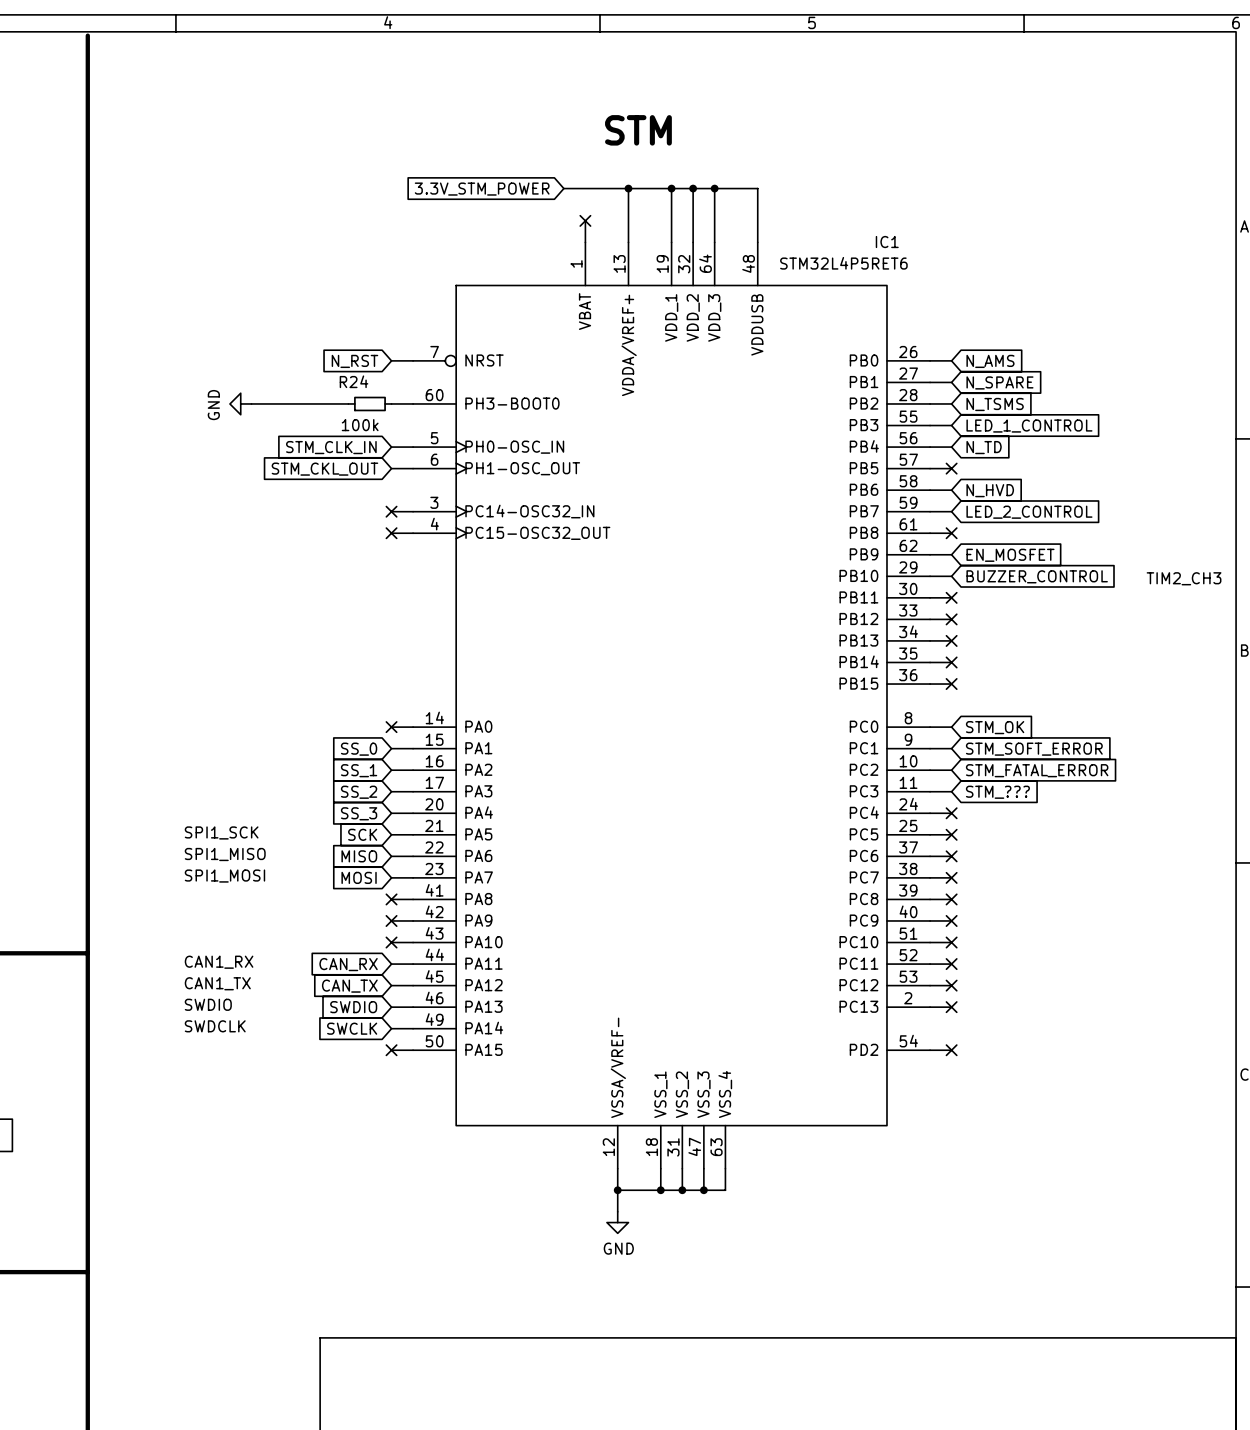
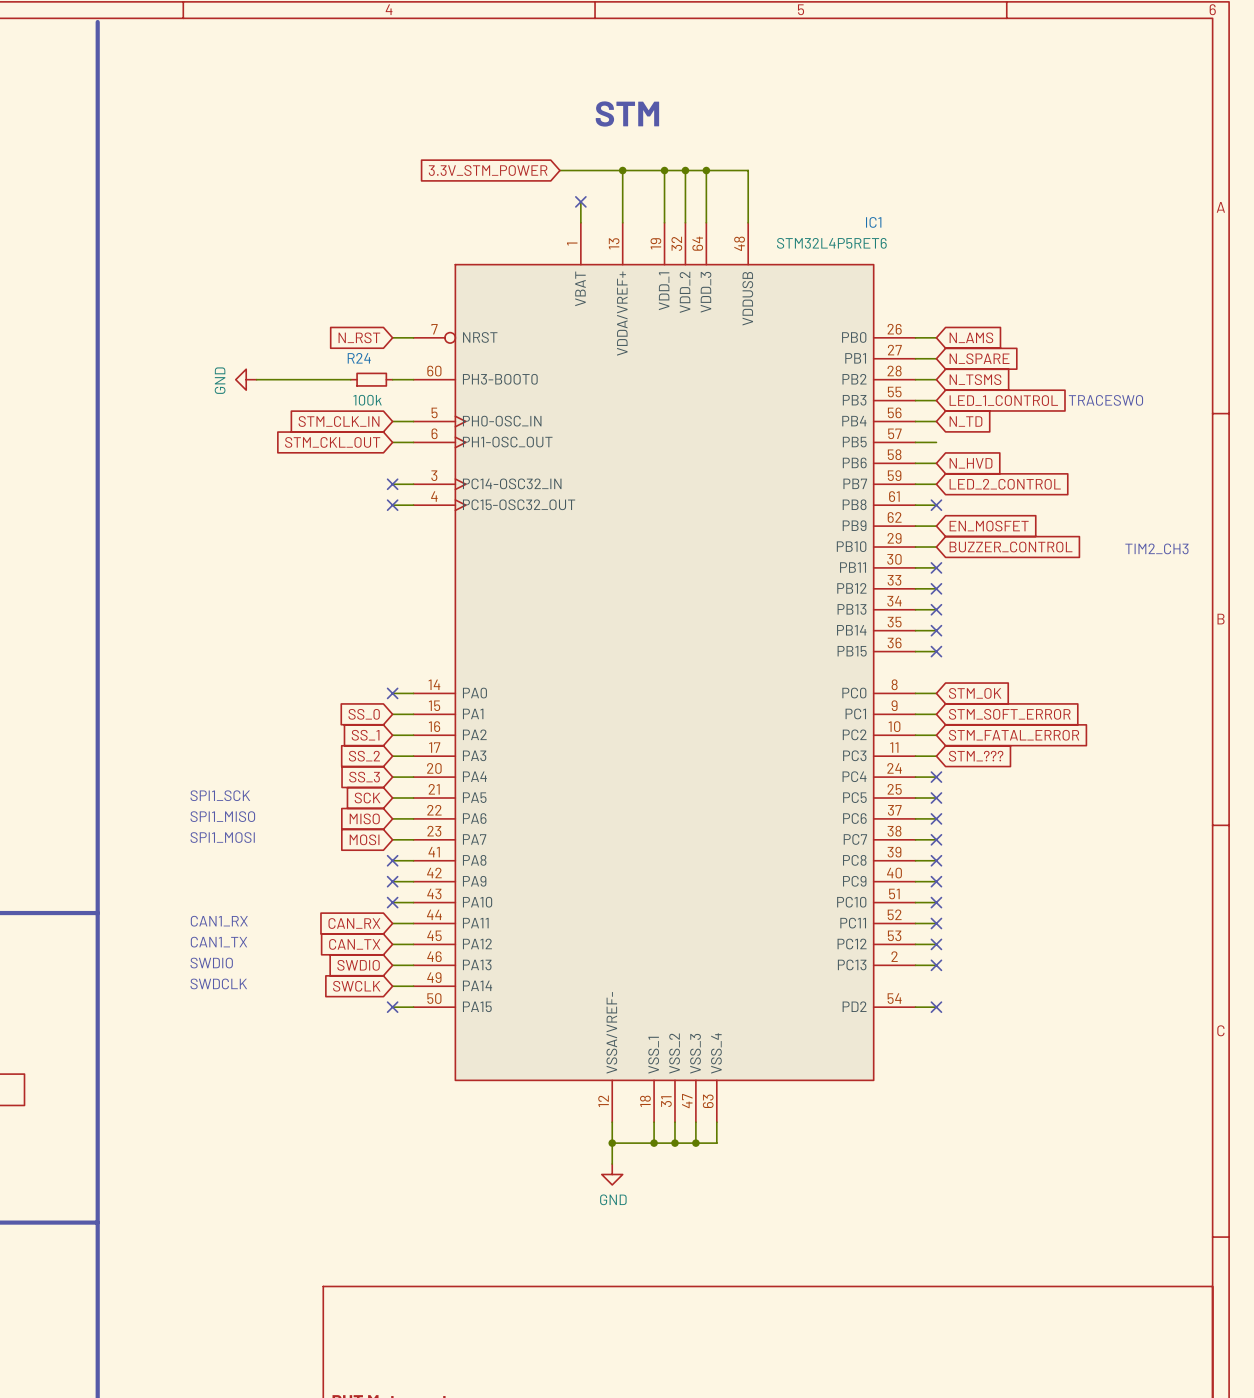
text: none -> TRACESWO (1105, 400)
no-connect mark: (951, 468) -> none

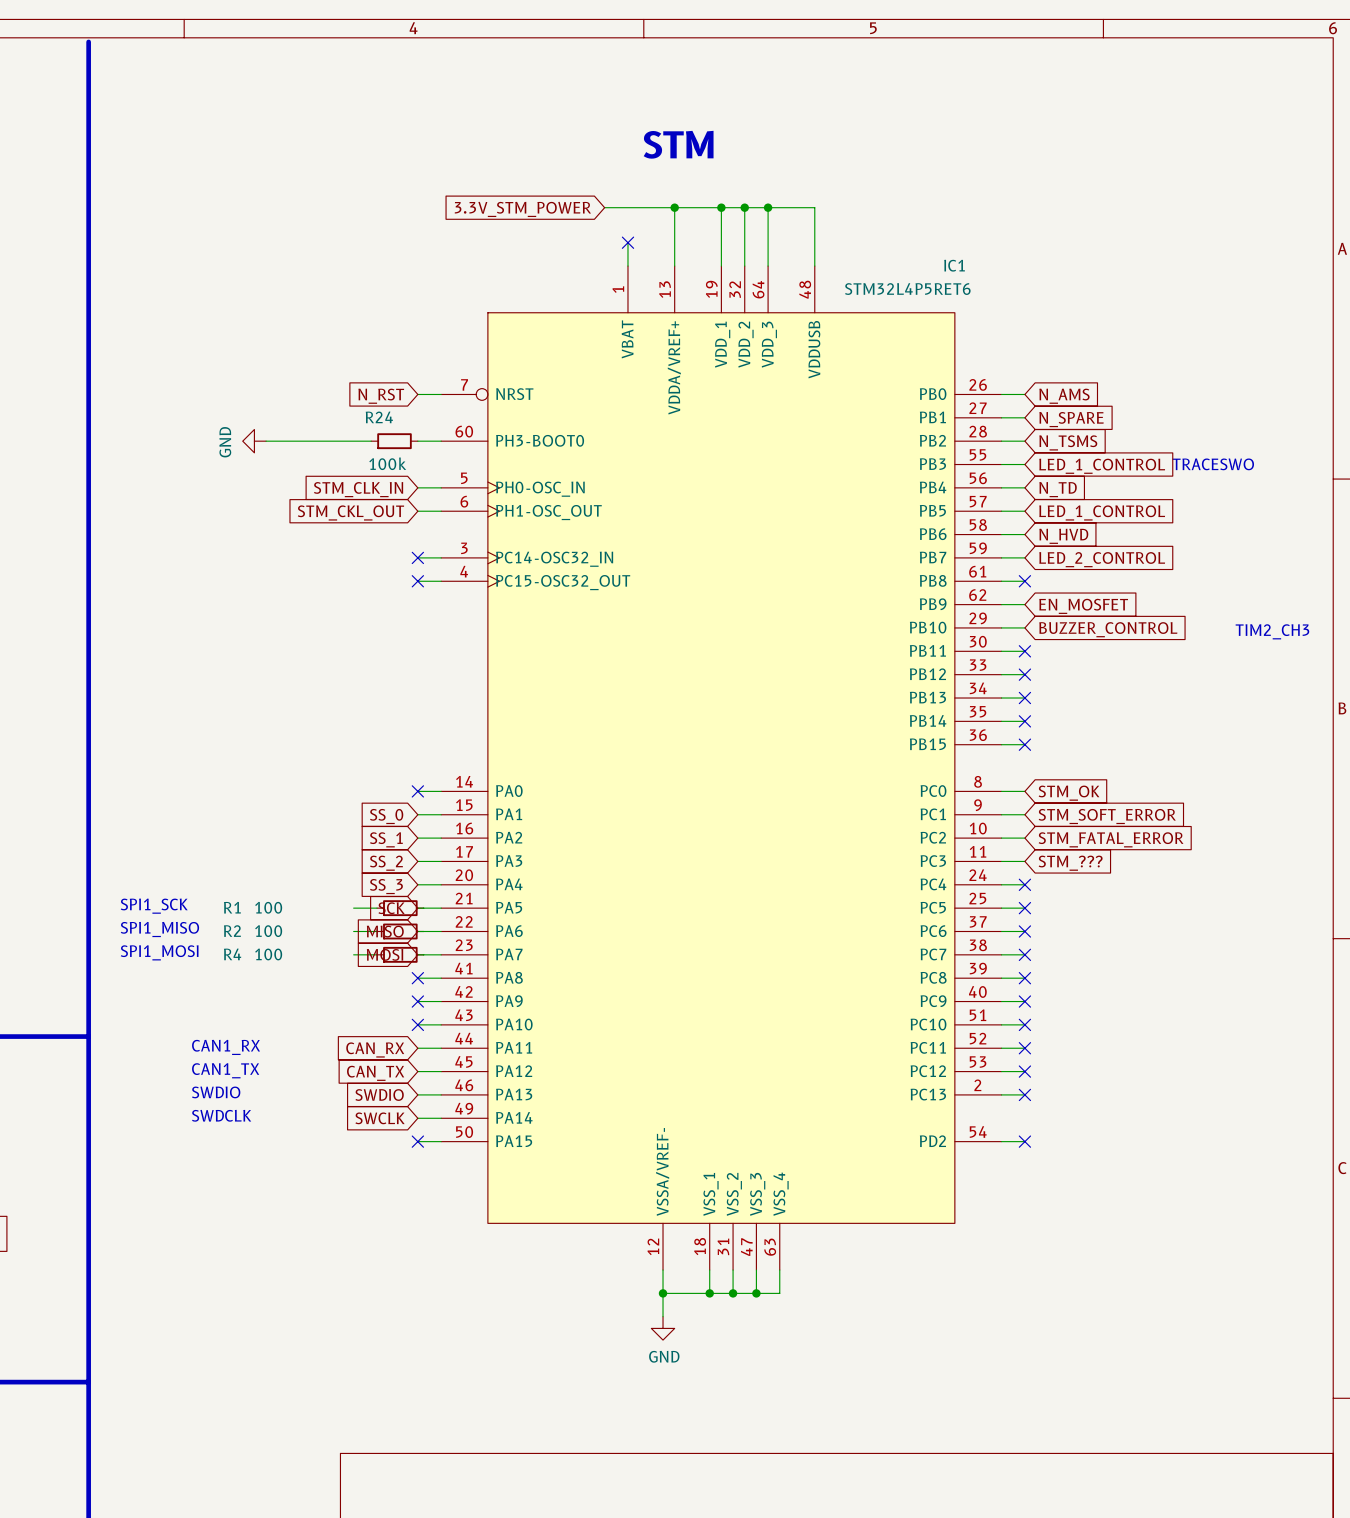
global label: none -> LED_1_CONTROL (1102, 512)
text position: SPI1_SCK (220, 795) -> SPI1_SCK (154, 906)
wire: none -> (353, 908) (376, 908)
R1: none -> 100 (400, 908)
text position: SPI1_MISO (222, 816) -> SPI1_MISO (159, 929)
wire: none -> (353, 931) (376, 931)
R2: none -> 100 (400, 931)
text position: SPI1_MOSI (222, 837) -> SPI1_MOSI (159, 952)
wire: none -> (353, 954) (376, 954)
R4: none -> 100 (400, 954)

